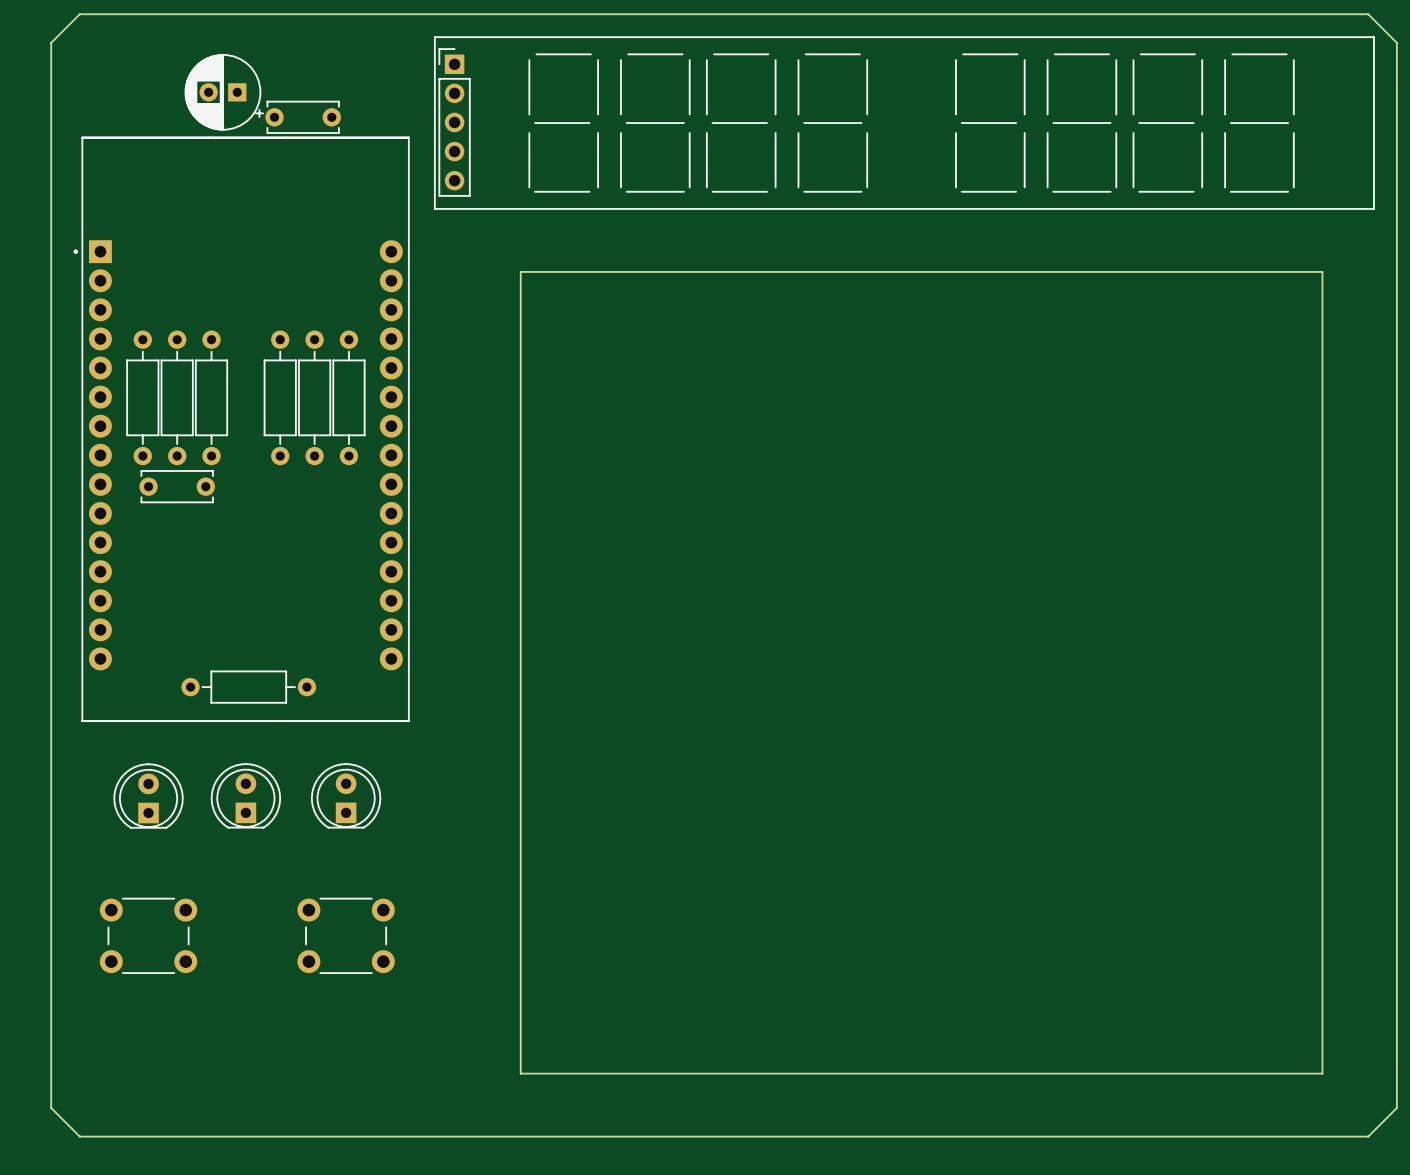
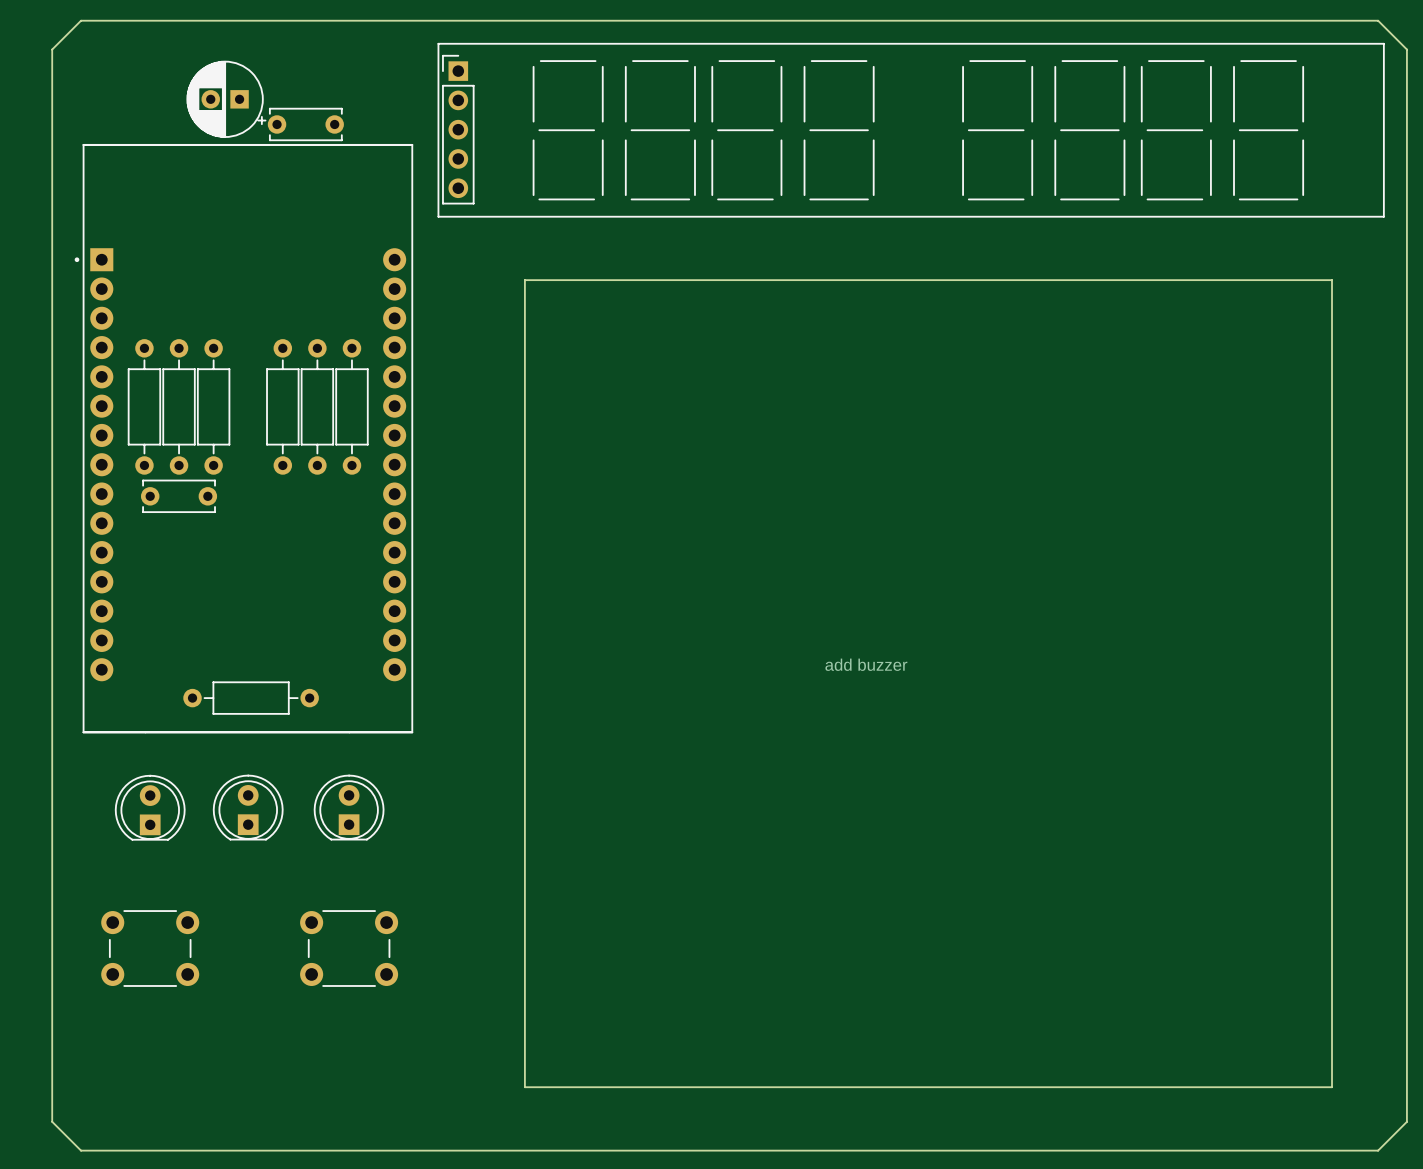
text: none -> add buzzer (866, 664)

